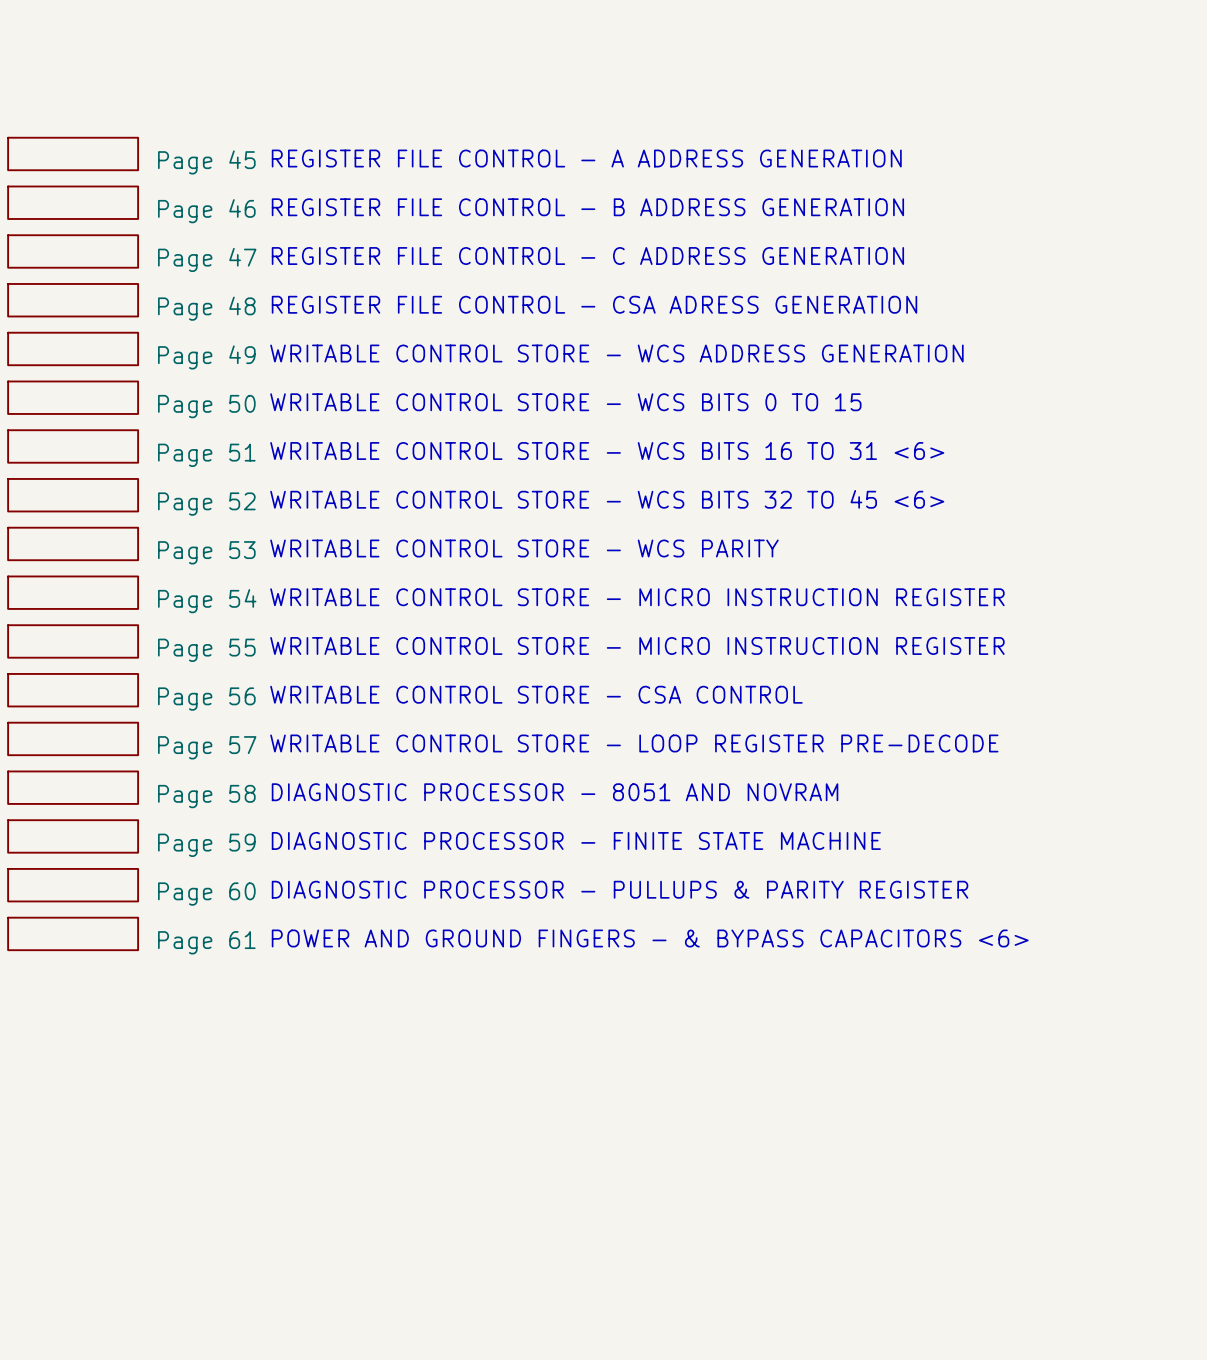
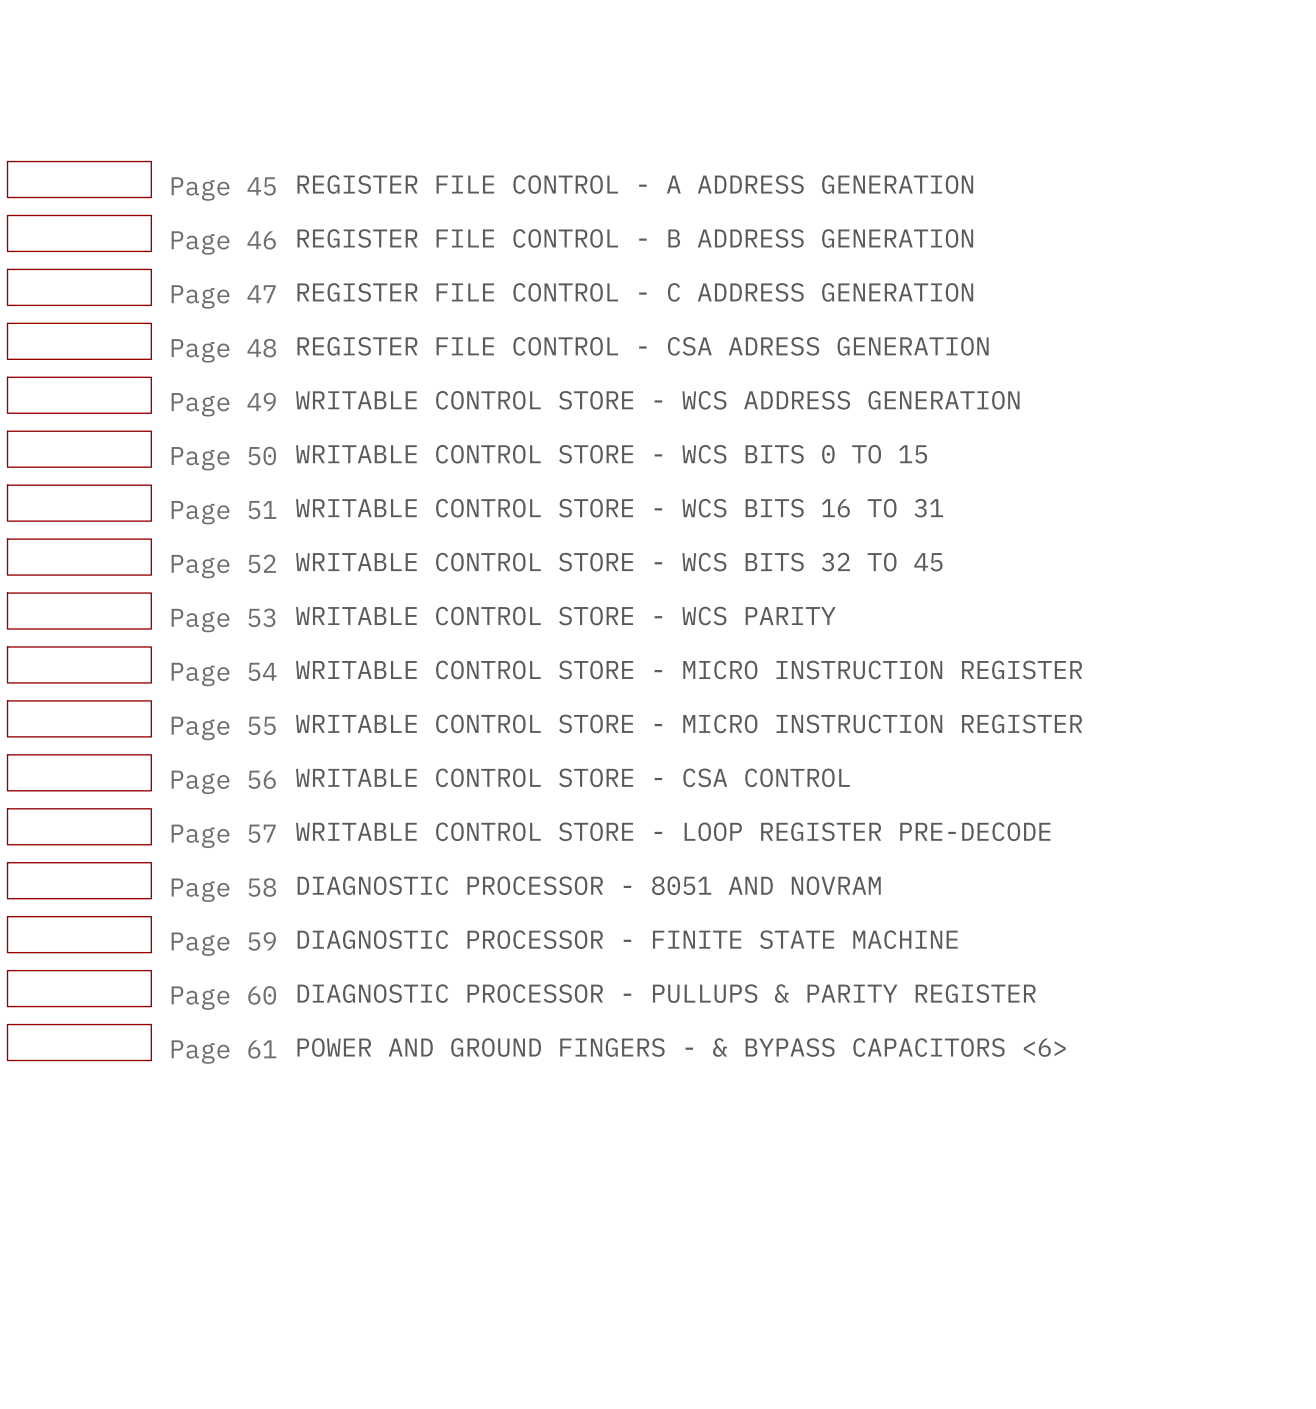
text: WRITABLE CONTROL STORE - WCS BITS 16 TO 31 <6> (607, 451) -> WRITABLE CONTROL STORE - WCS BITS 16 TO 31 (619, 508)
text: WRITABLE CONTROL STORE - WCS BITS 32 TO 45 <6> (607, 499) -> WRITABLE CONTROL STORE - WCS BITS 32 TO 45 (619, 562)

